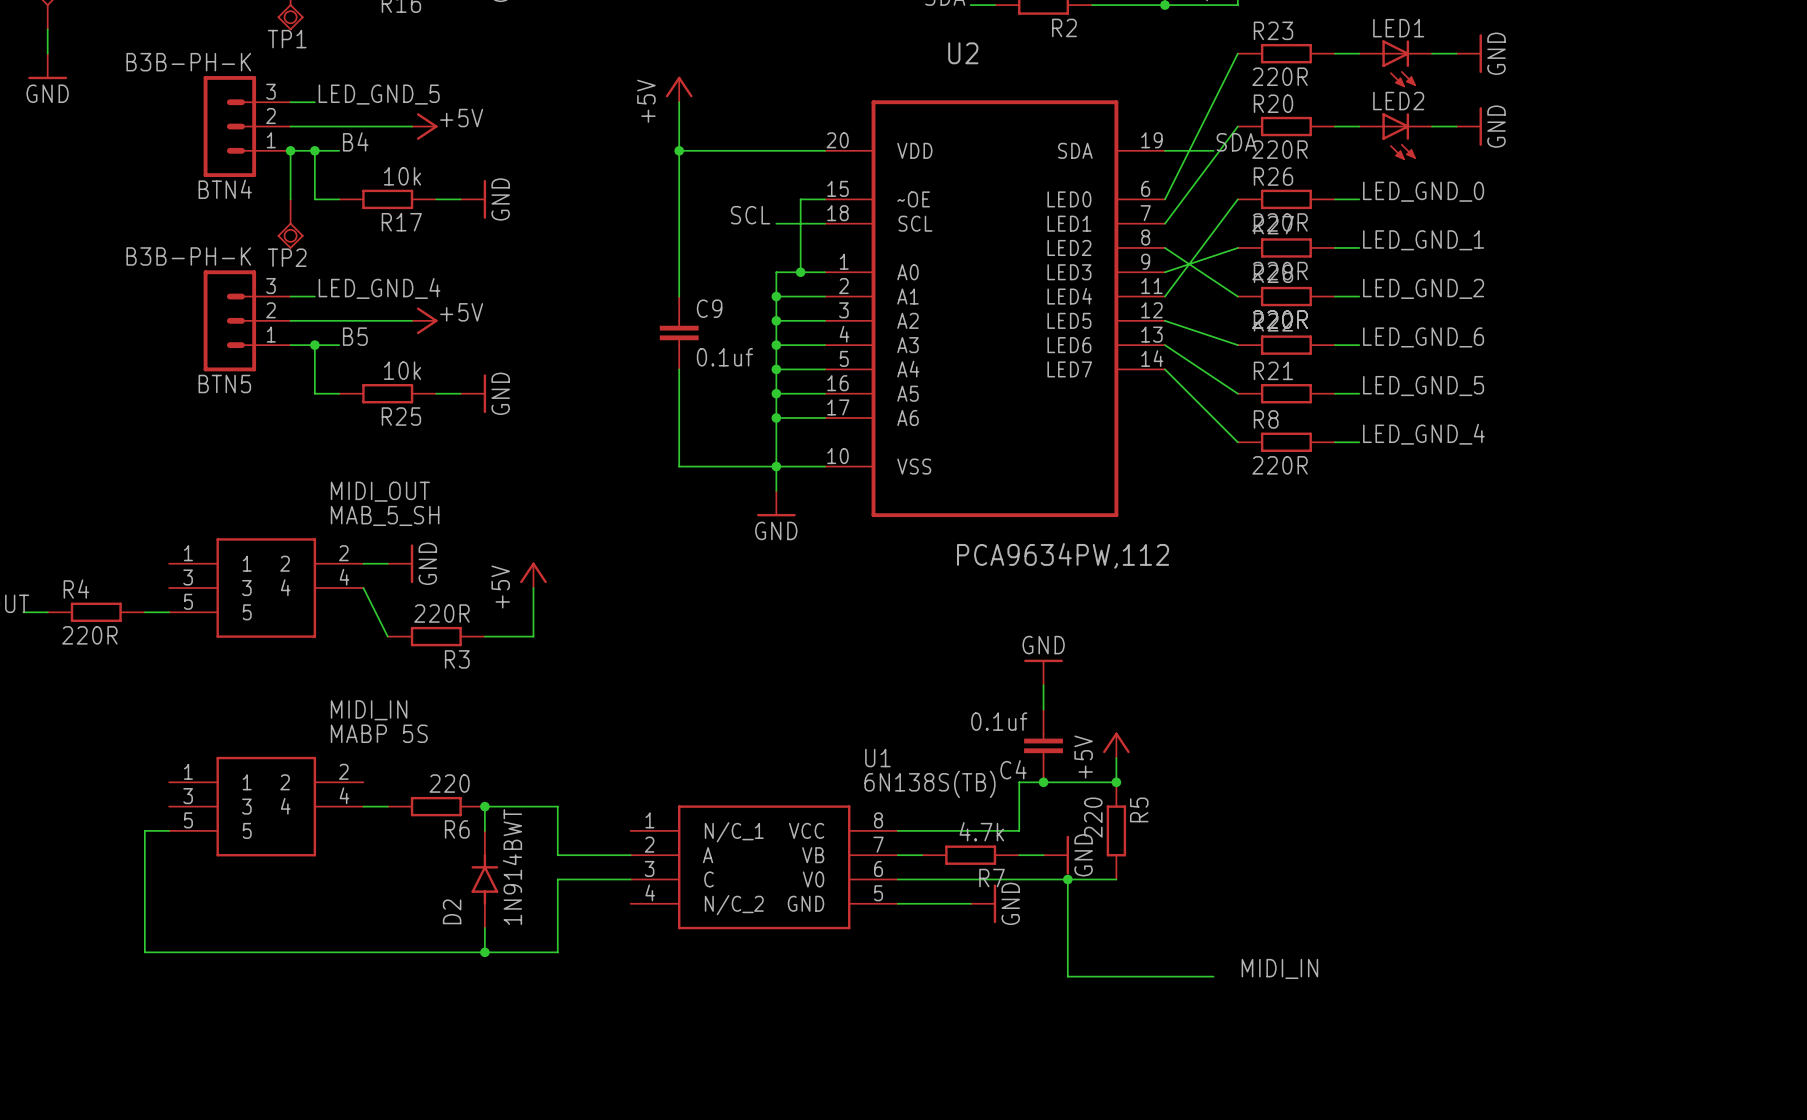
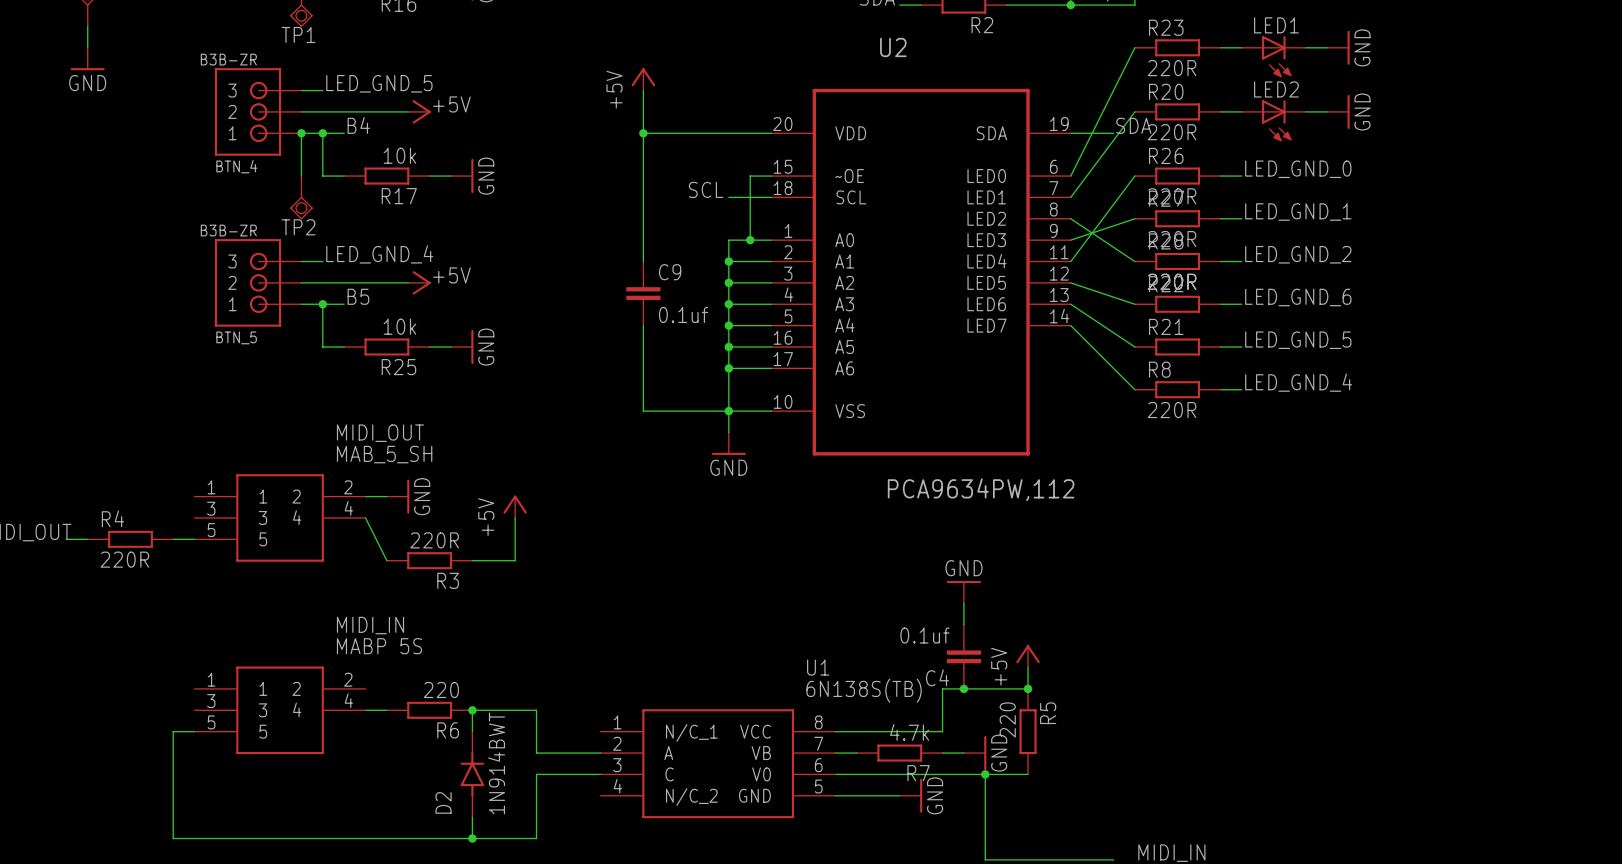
BTN_4: none -> B3B-ZR (258, 111)
BTN4: B3B-PH-K (247, 126) -> none
BTN_5: none -> B3B-ZR (258, 282)
BTN5: B3B-PH-K (247, 320) -> none

